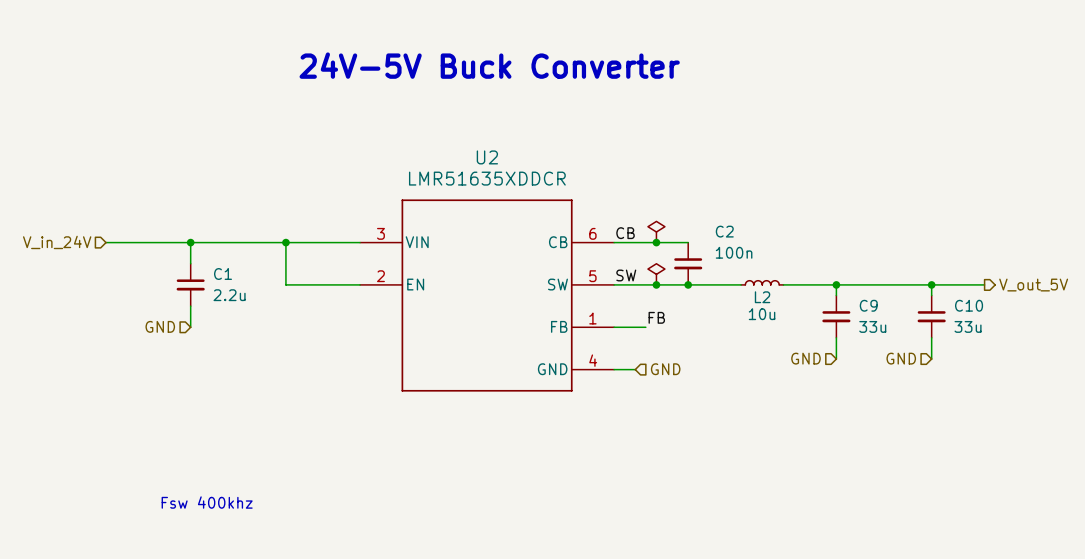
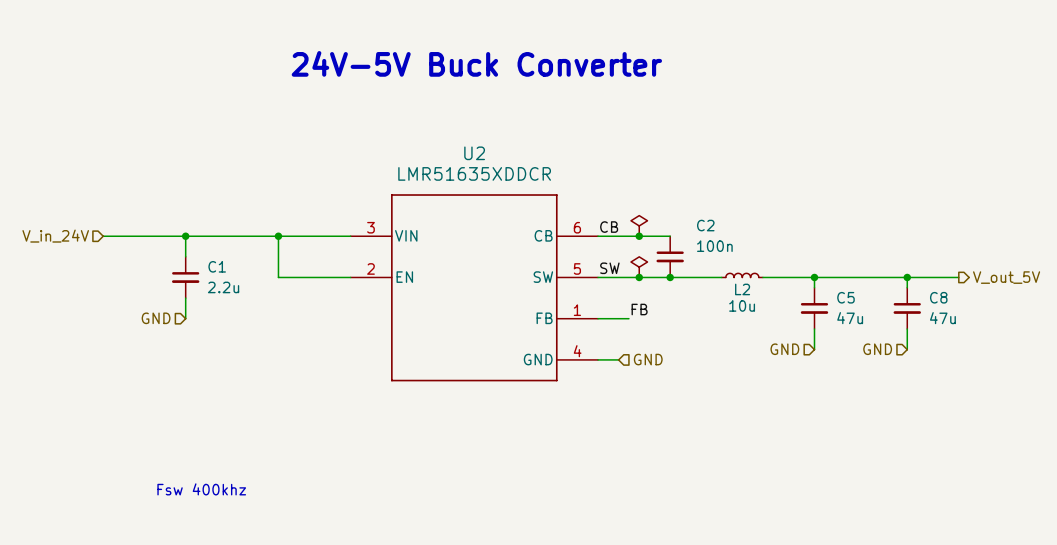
C9 name: C9 (868, 305) -> C5 (845, 297)
C10 name: C10 (969, 305) -> C8 (938, 297)
C9 value: 33u (872, 326) -> 47u (850, 318)
C10 value: 33u (968, 326) -> 47u (942, 318)

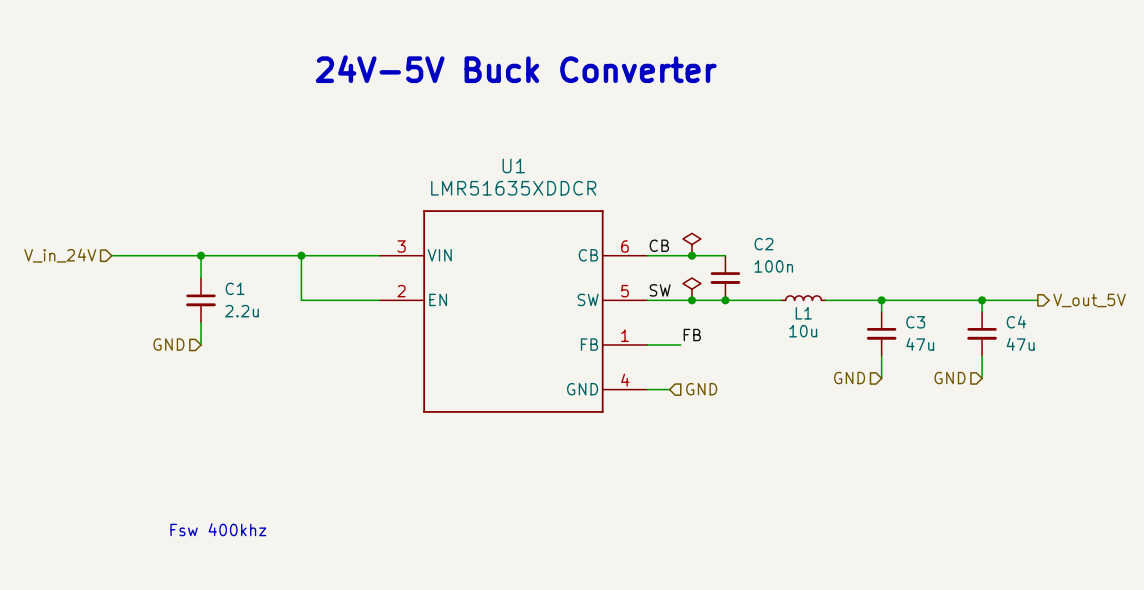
U2 name: U2 (474, 153) -> U1 (513, 165)
L2 name: L2 (742, 289) -> L1 (803, 313)
C5 name: C5 (845, 297) -> C3 (915, 322)
C8 name: C8 (938, 297) -> C4 (1016, 322)

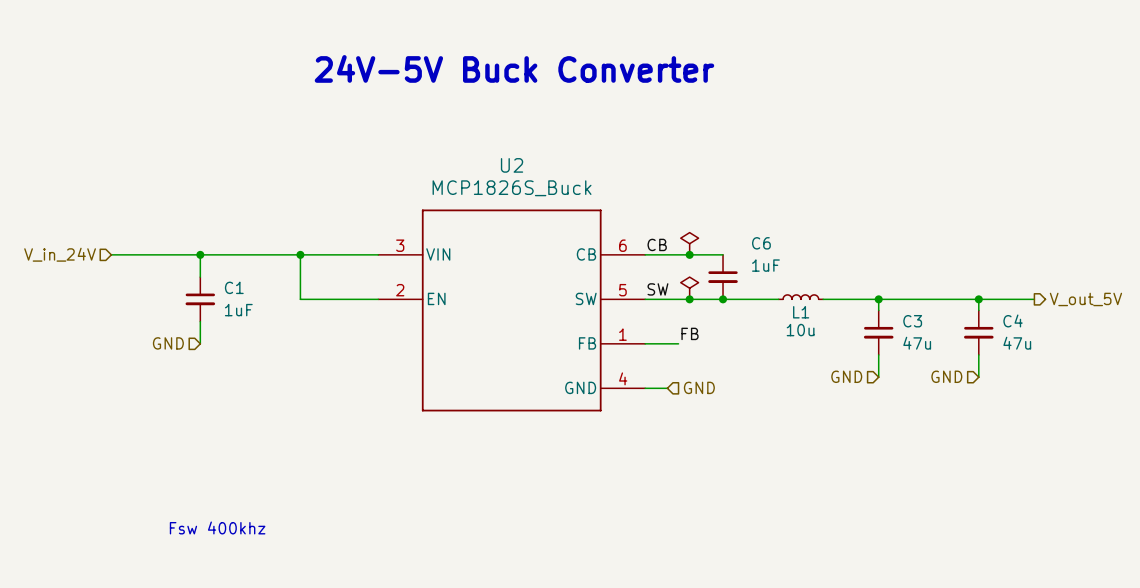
U1 name: U1 (513, 165) -> U2 (512, 165)
U1 value: LMR51635XDDCR (513, 188) -> MCP1826S_Buck (512, 188)
C2 name: C2 (763, 244) -> C6 (761, 243)
C2 value: 100n (773, 266) -> 1uF (765, 265)
C1 value: 2.2u (241, 311) -> 1uF (238, 310)

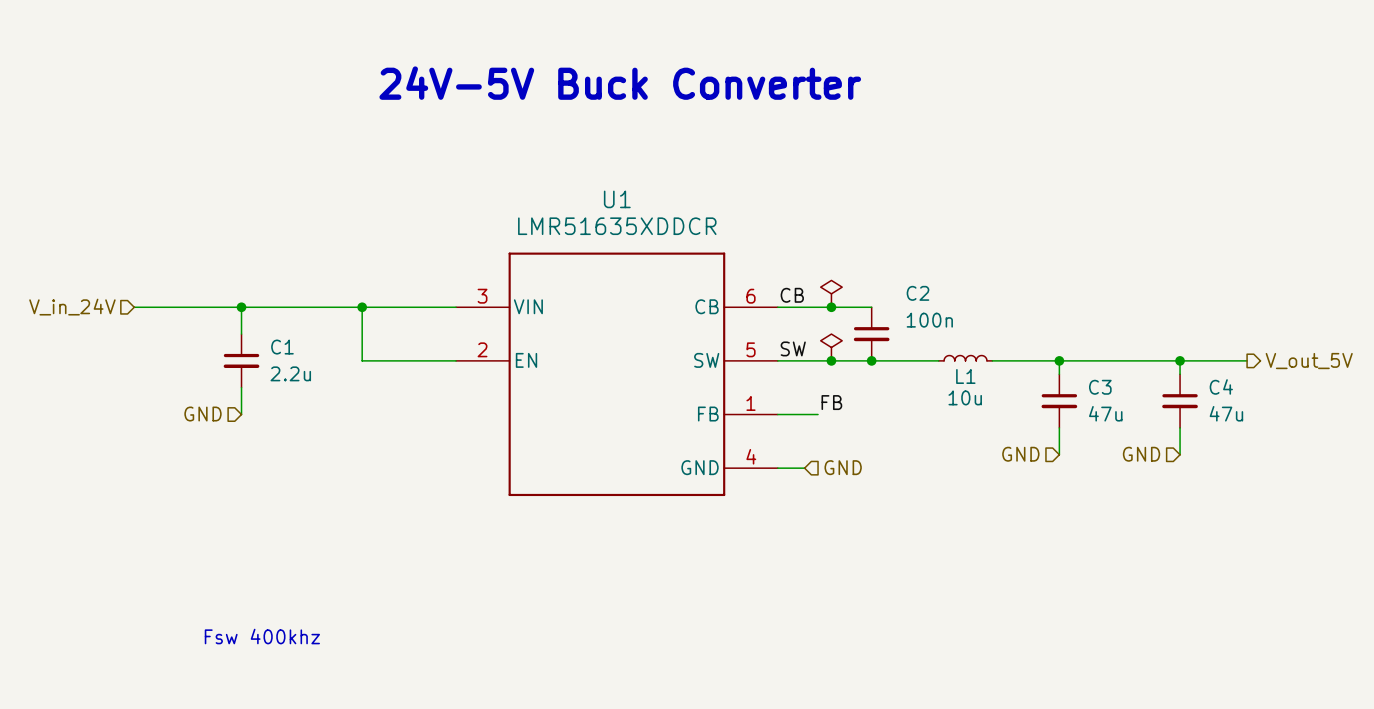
U2 name: U2 (512, 165) -> U1 (617, 199)
U2 value: MCP1826S_Buck (512, 188) -> LMR51635XDDCR (617, 226)
C6 name: C6 (761, 243) -> C2 (917, 293)
C6 value: 1uF (765, 265) -> 100n (929, 320)
C1 value: 1uF (238, 310) -> 2.2u (290, 373)

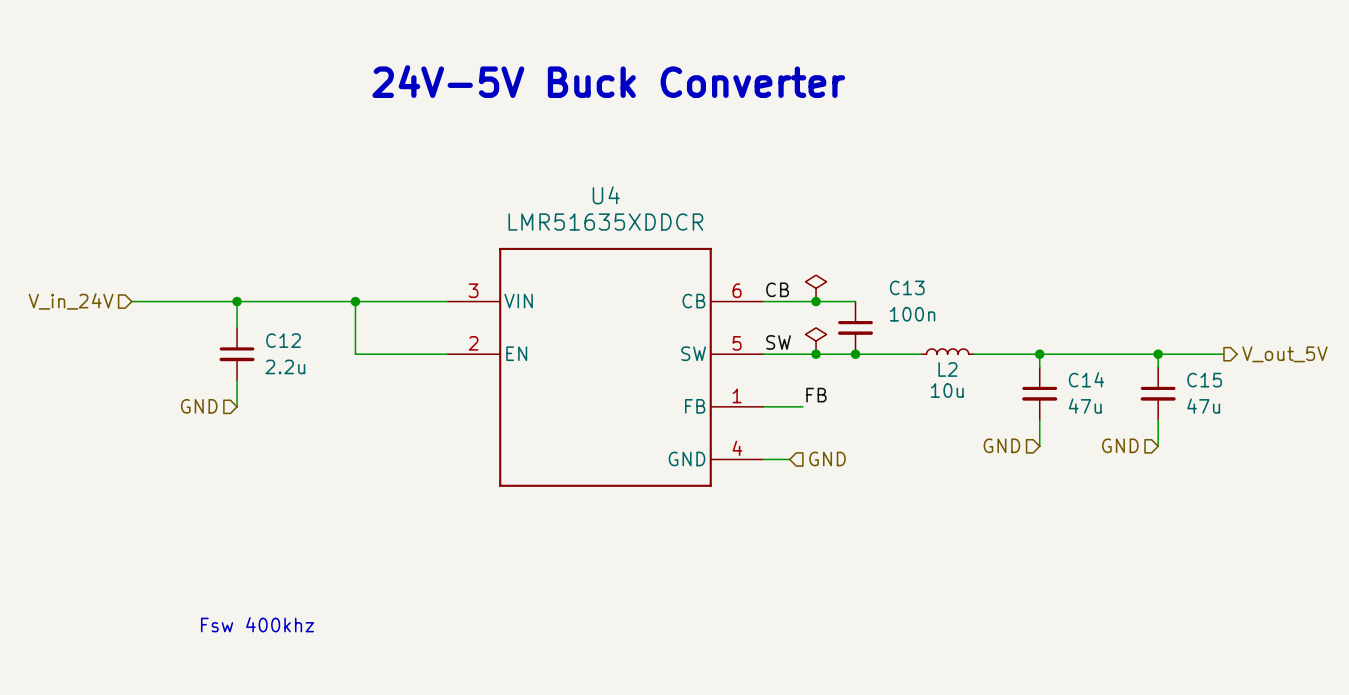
U1 name: U1 (617, 199) -> U4 (606, 195)
C2 name: C2 (917, 293) -> C13 (907, 287)
C1 name: C1 (282, 347) -> C12 (283, 340)
L1 name: L1 (965, 376) -> L2 (947, 369)
C4 name: C4 (1221, 386) -> C15 (1204, 380)
C3 name: C3 (1100, 387) -> C14 (1086, 379)

